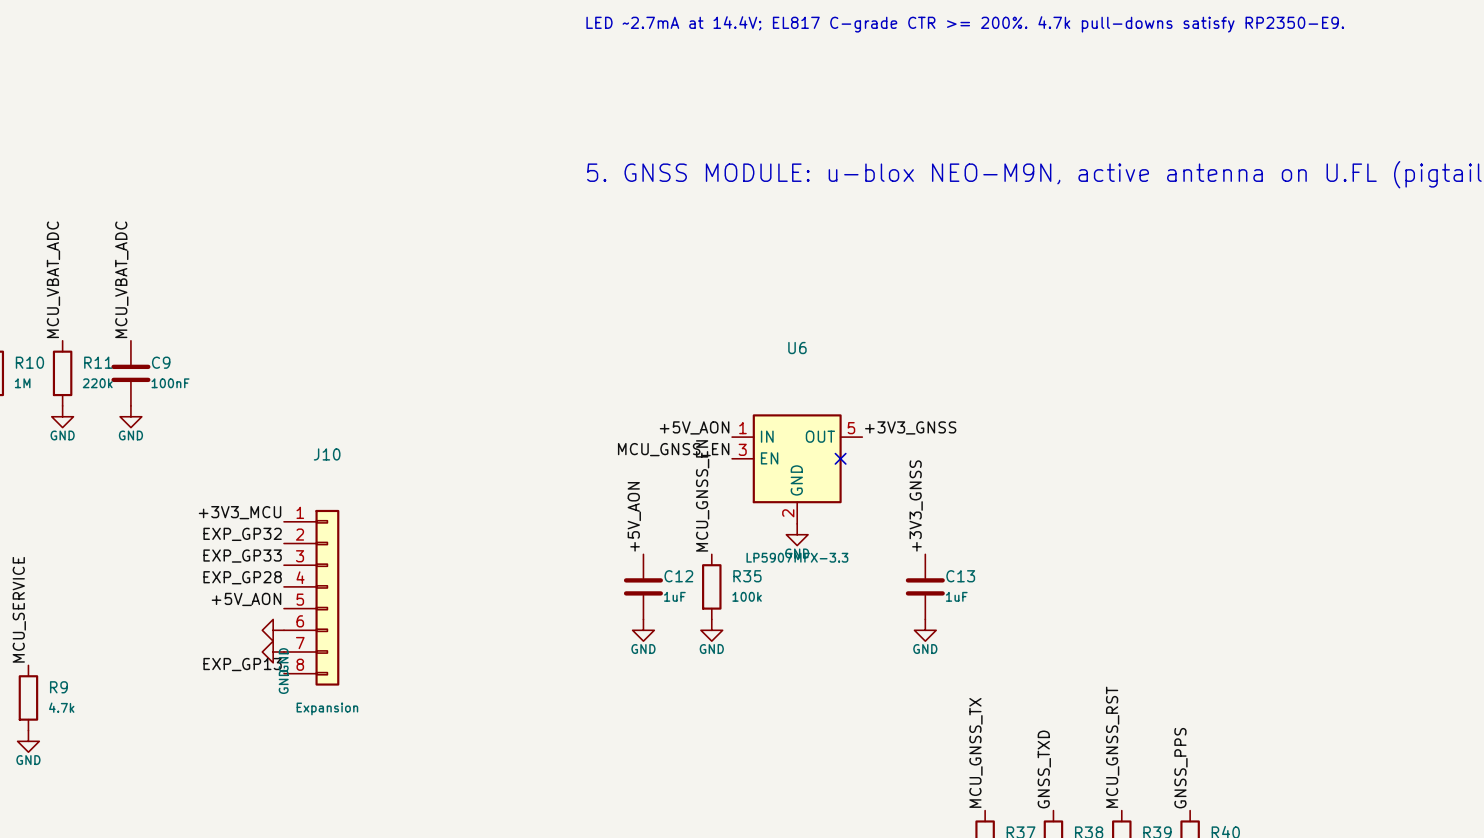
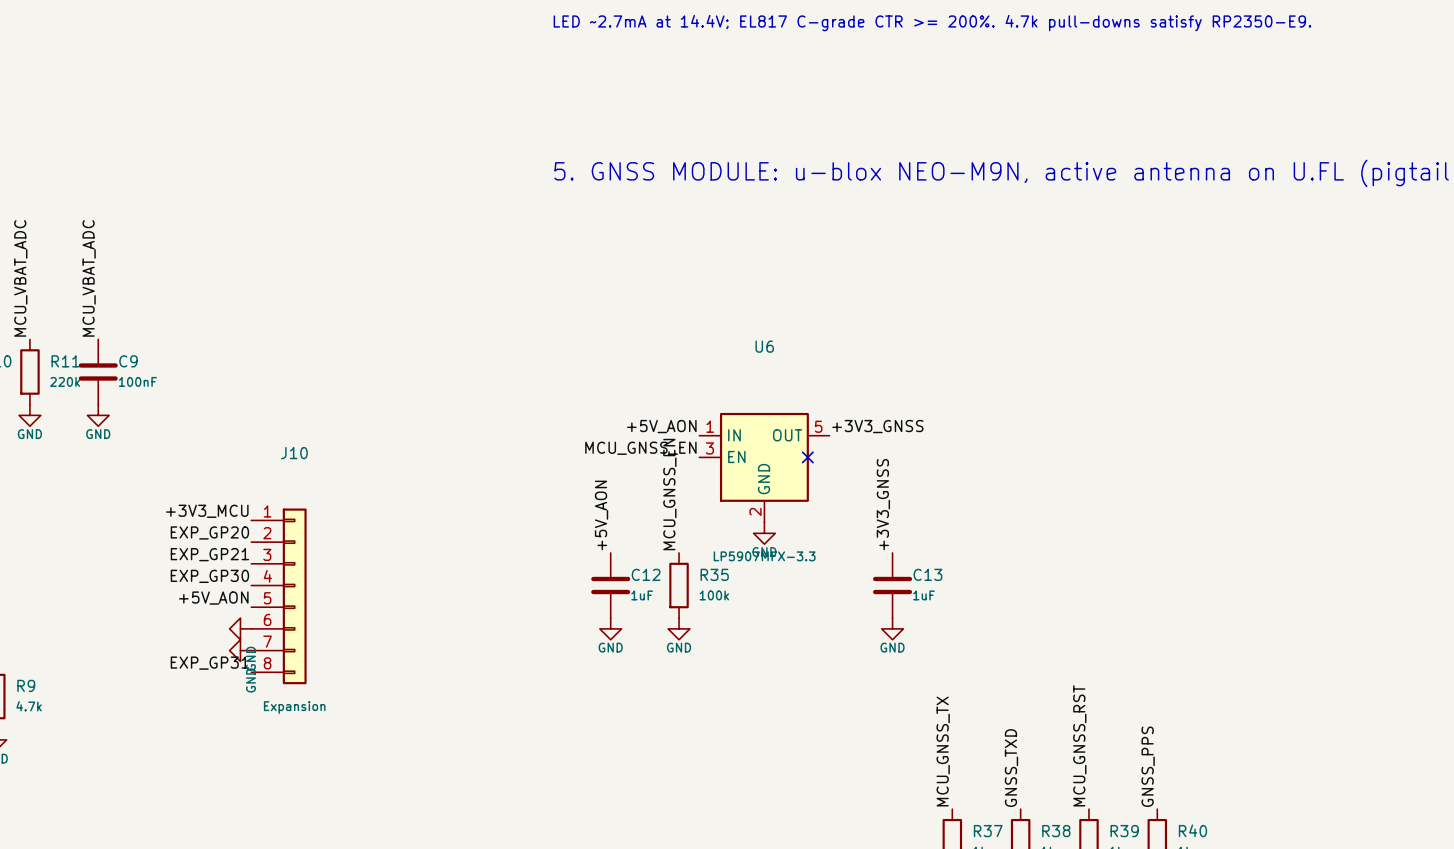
label: EXP_GP32 (242, 534) -> EXP_GP20 (209, 532)
label: EXP_GP33 (242, 556) -> EXP_GP21 (209, 554)
label: EXP_GP28 (242, 577) -> EXP_GP30 (209, 576)
label: EXP_GP13 (242, 664) -> EXP_GP31 (209, 663)

